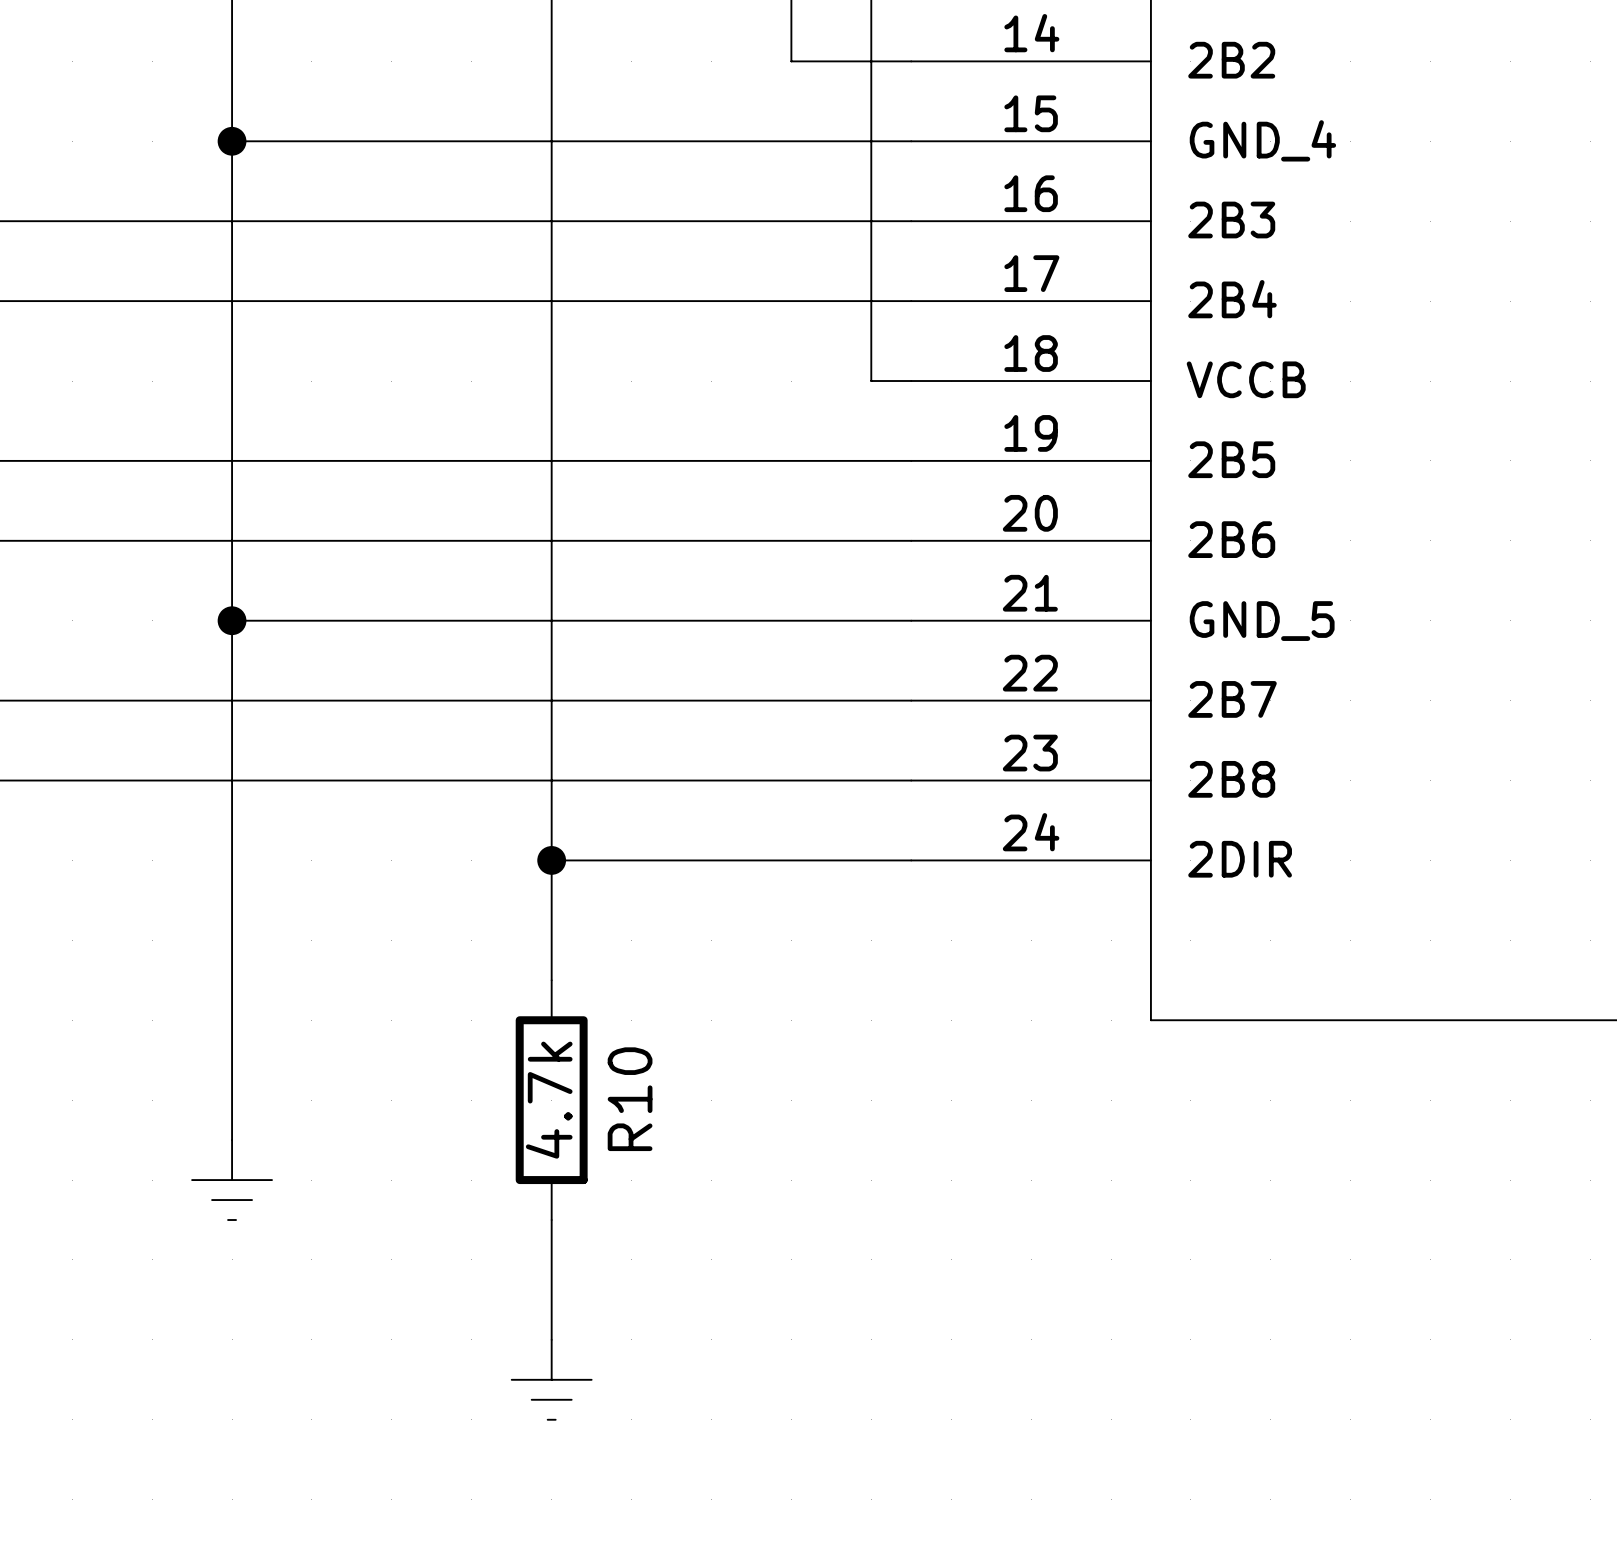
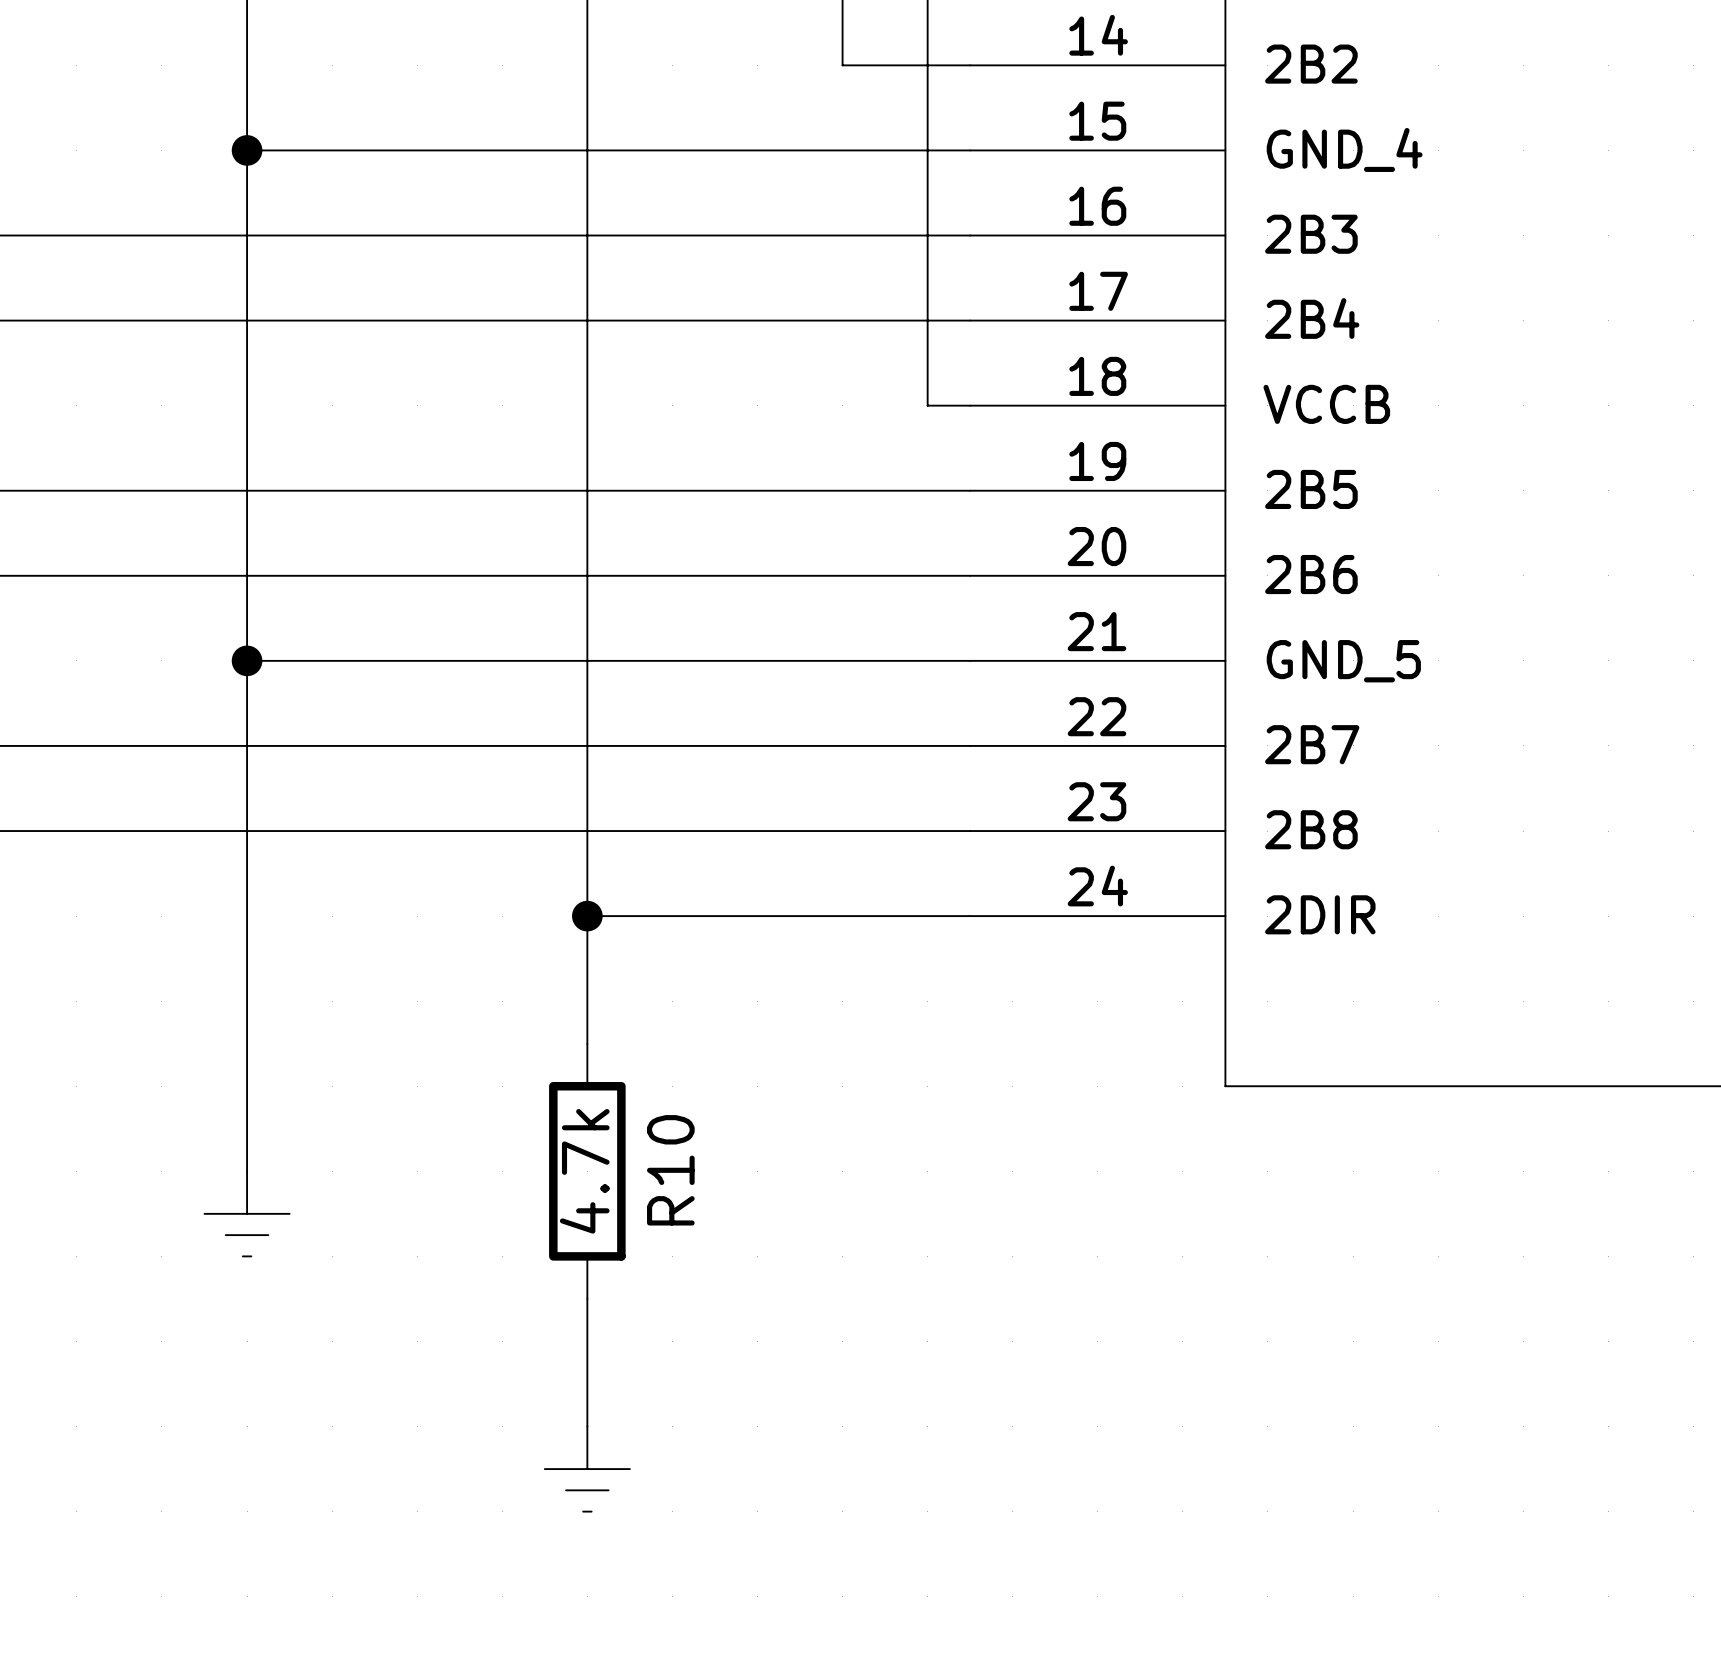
power symbol position: (232, 1180) -> (247, 1213)

